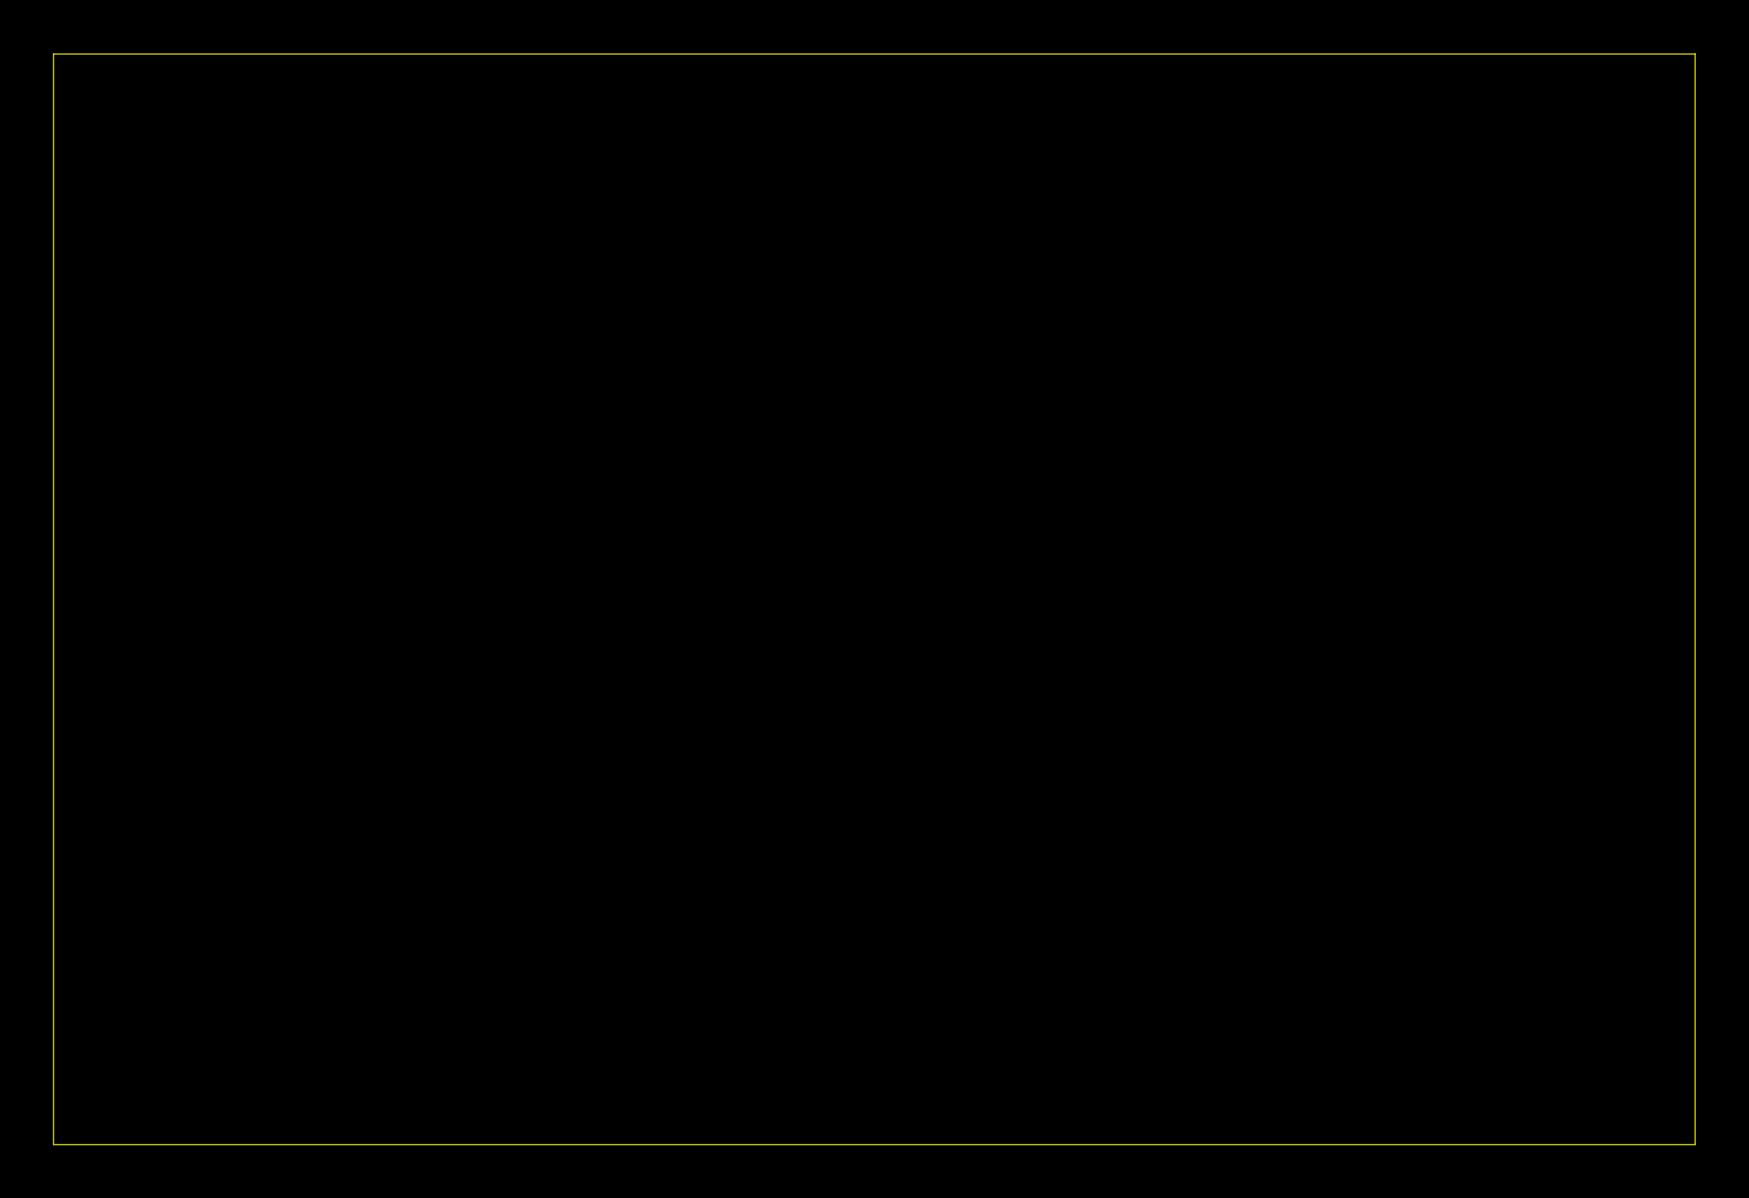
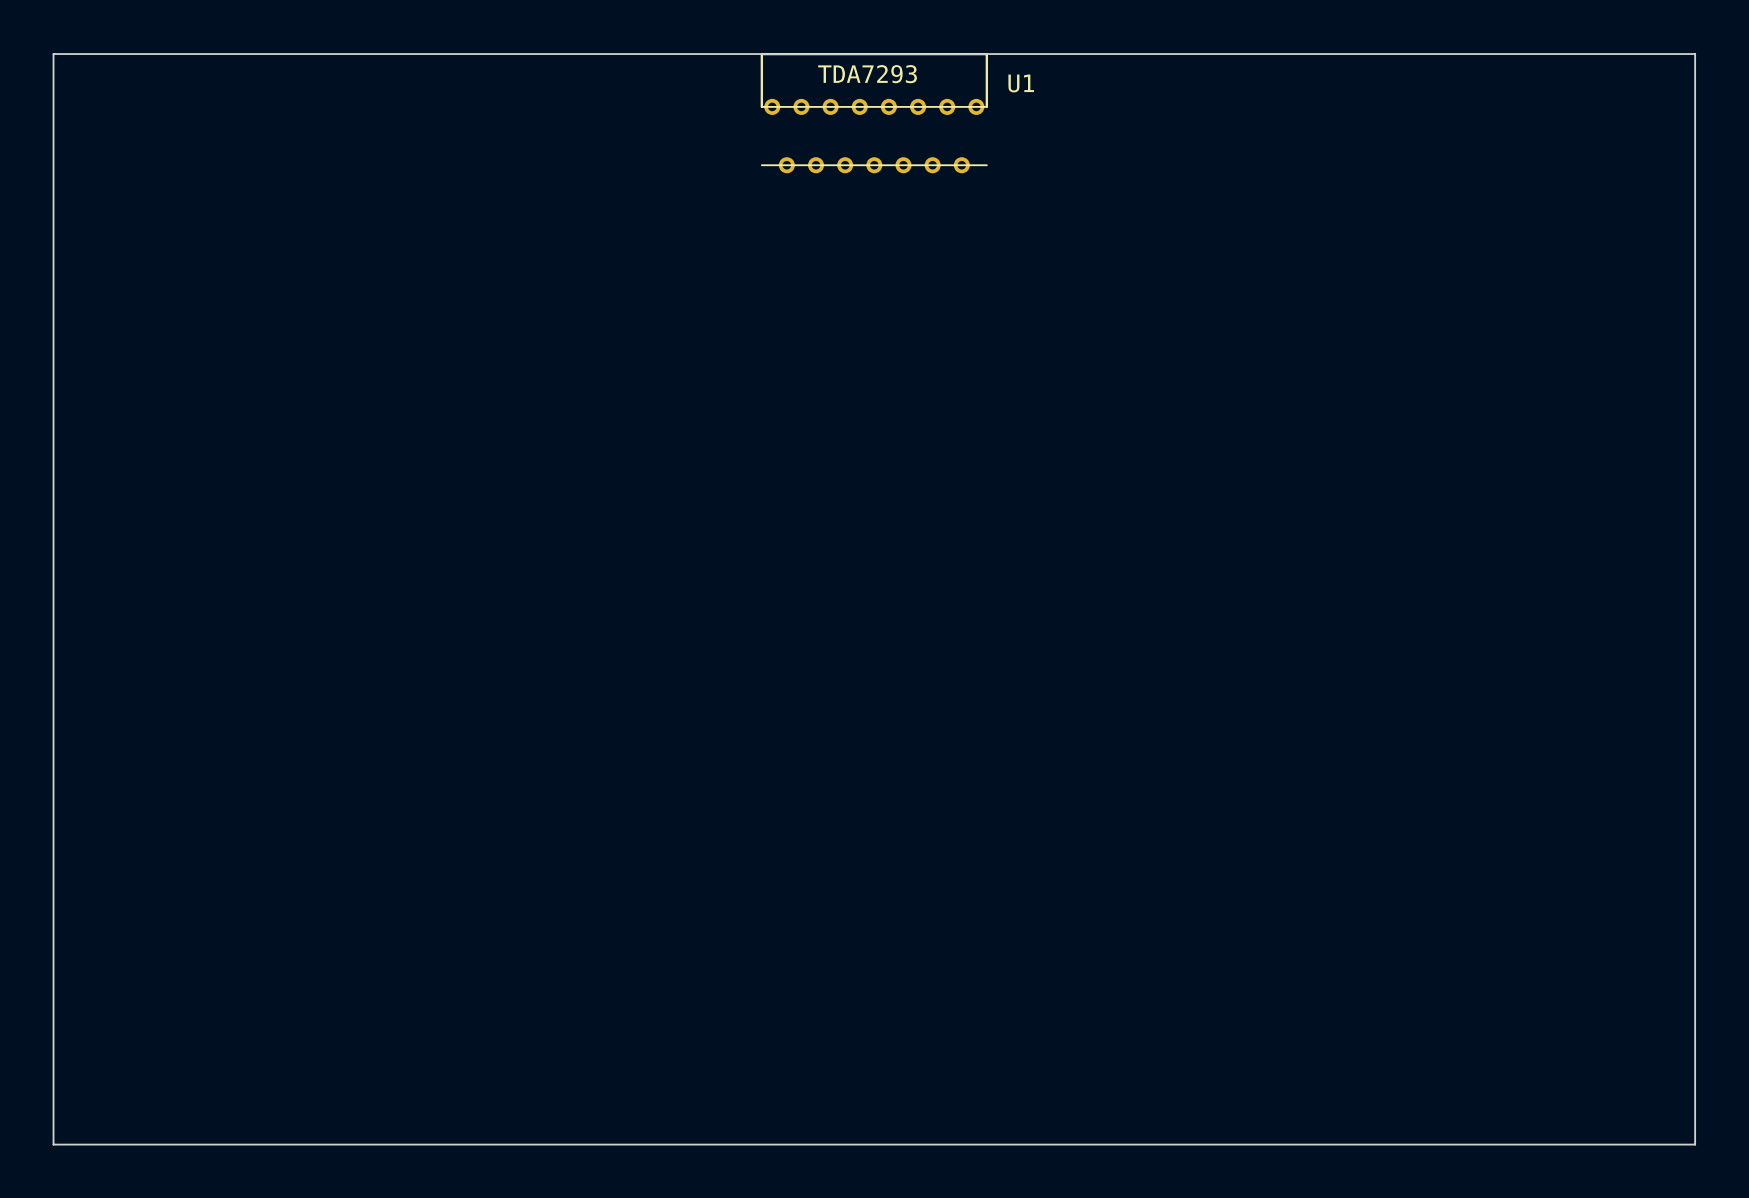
U1: none -> TDA7293 (874, 113)

